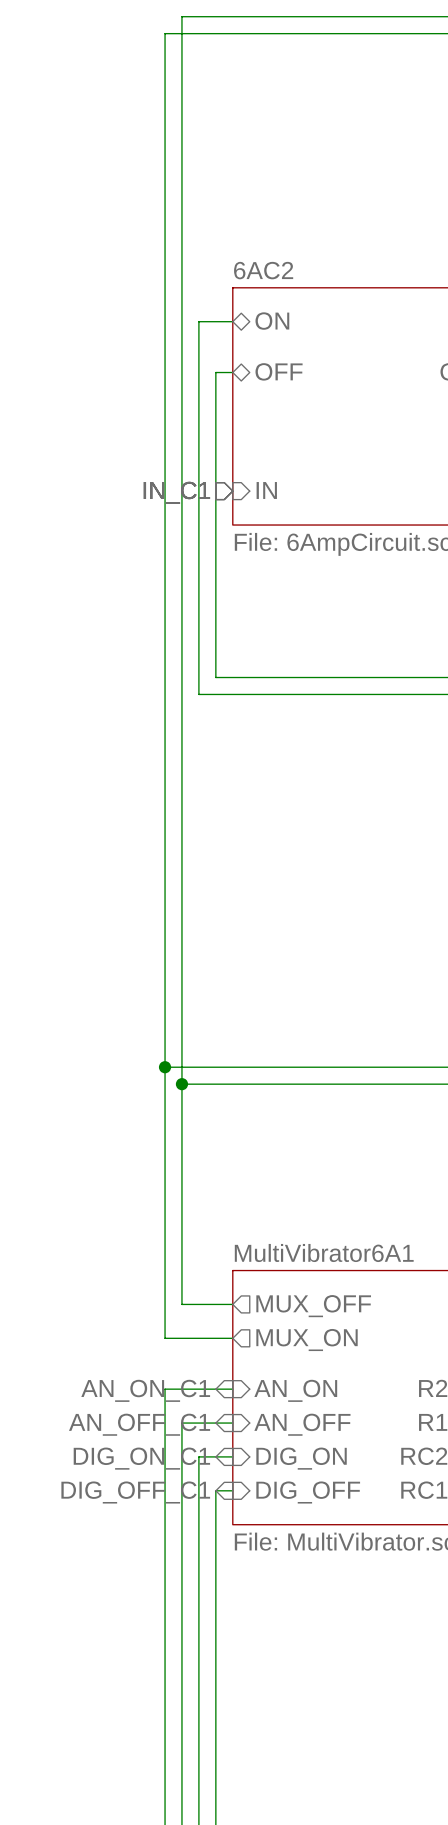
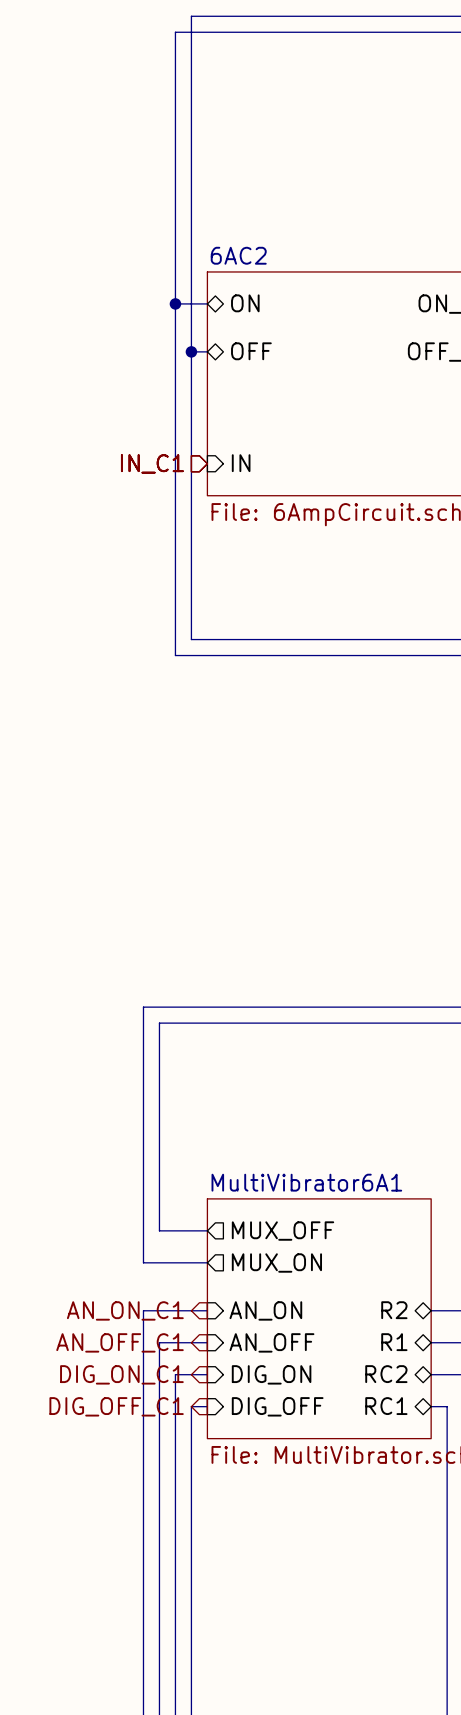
wire: (215, 16) (181, 16) (181, 1084) -> (191, 16) (191, 351)
wire: (198, 33) (165, 33) (165, 1067) -> (175, 32) (175, 303)
junction: none -> (175, 303)
junction: none -> (191, 351)
junction: (165, 1067) -> none
junction: (181, 1084) -> none

